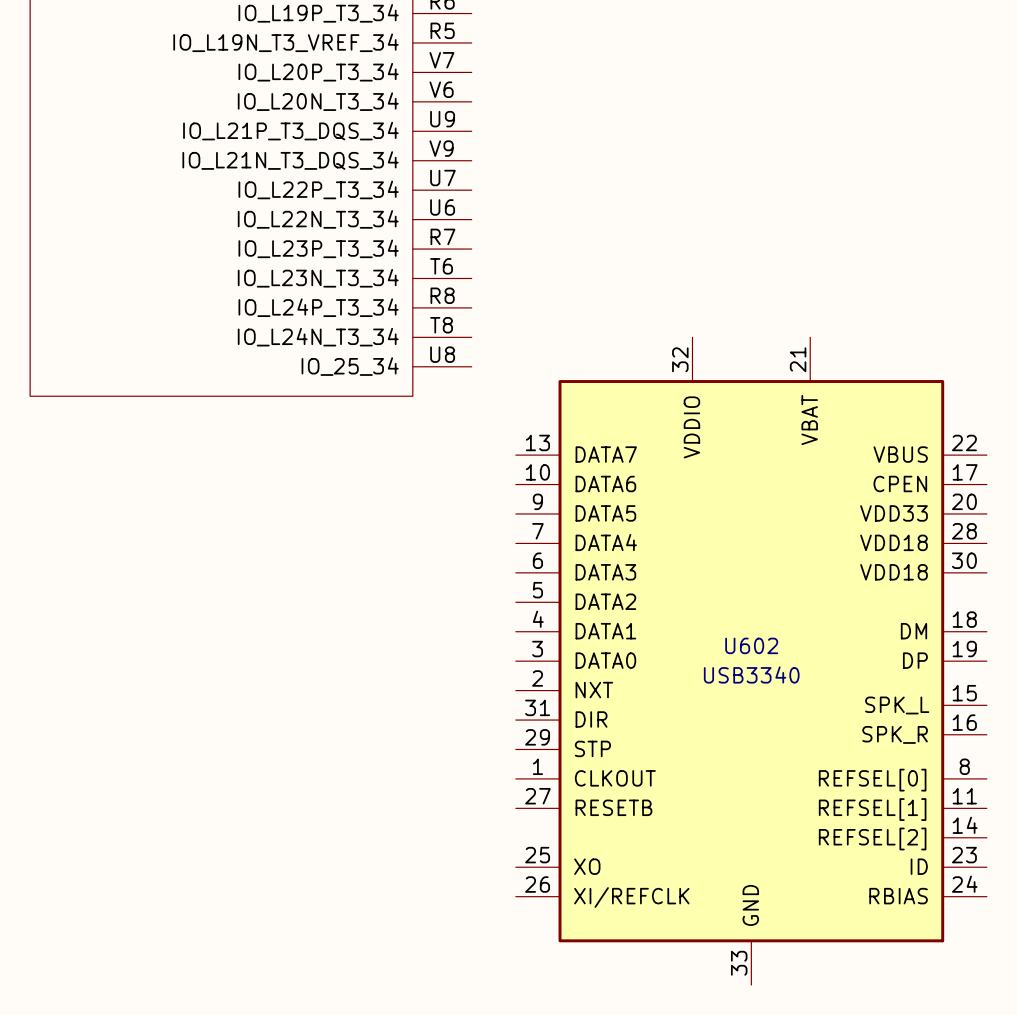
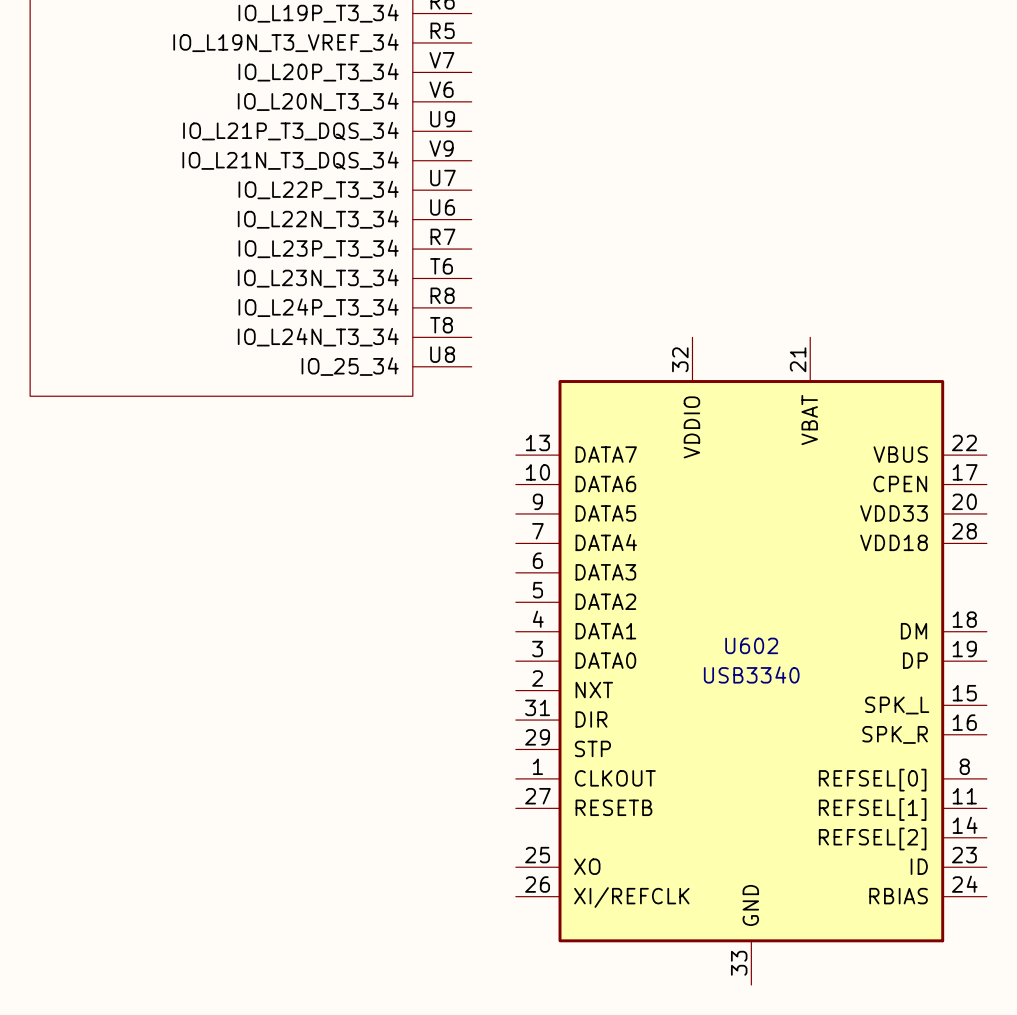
U602 symbol: [515, 337, 987, 985] -> [515, 337, 987, 985]

